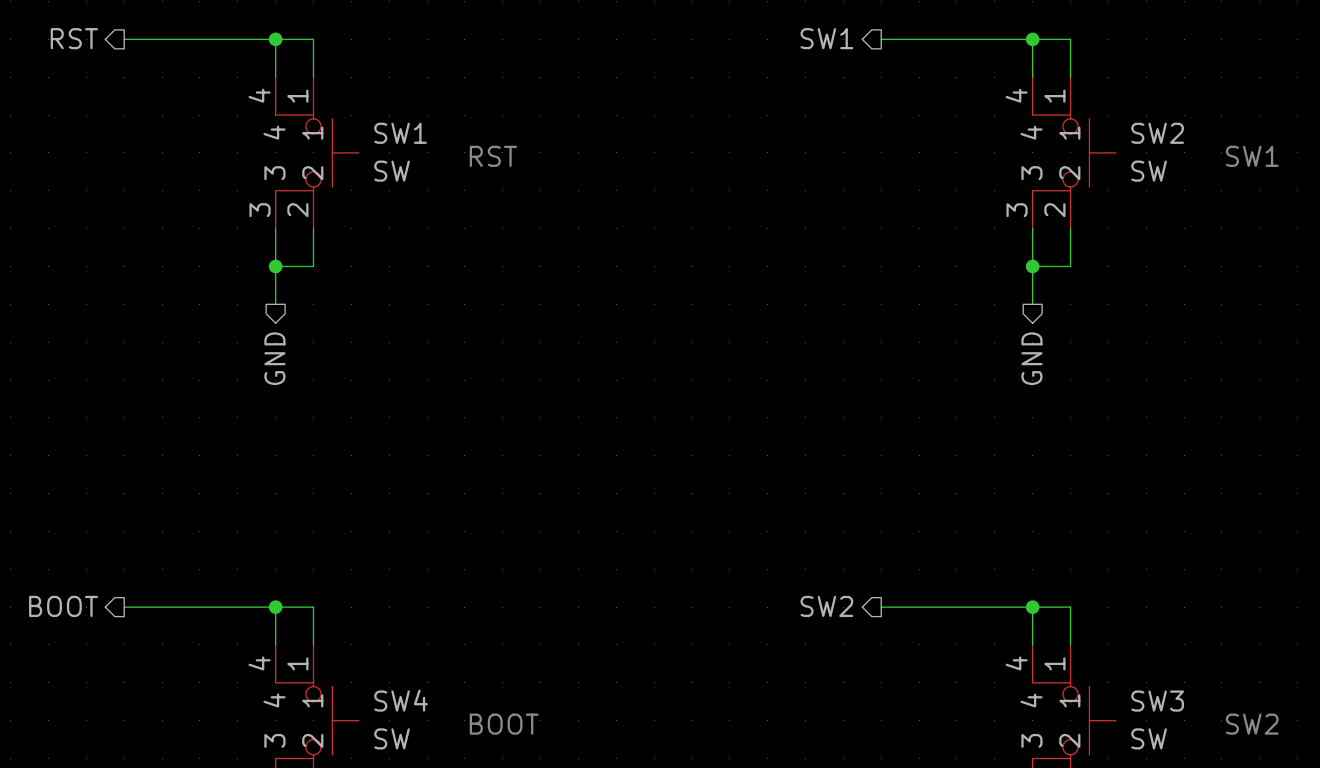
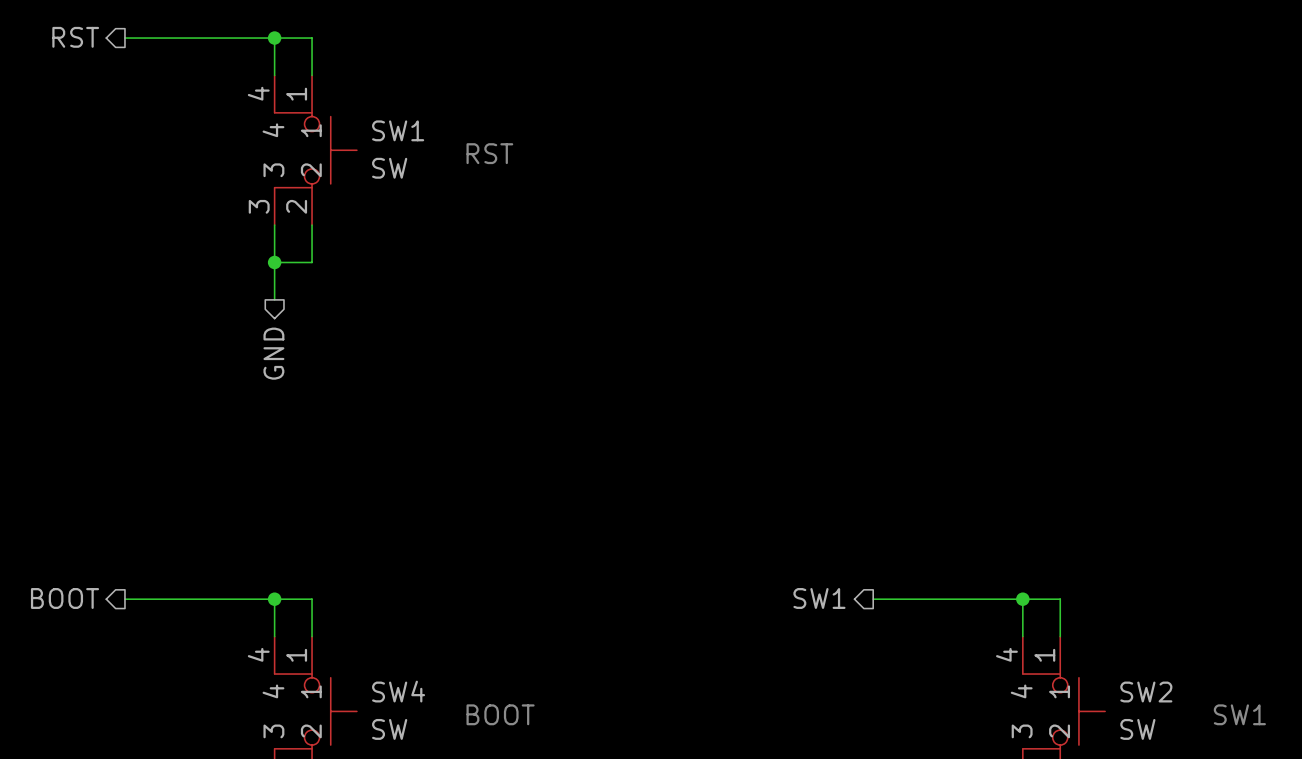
hierarchical label: SW1 (826, 38) -> none
wire: (881, 39) (1070, 39) (1070, 77) -> none
wire: (1032, 39) (1032, 77) -> none
junction: (1032, 39) -> none
SW2: SW (1074, 152) -> none
text: SW1 (1252, 156) -> none
wire: (1032, 228) (1032, 304) -> none
wire: (1070, 228) (1070, 266) (1032, 266) -> none
junction: (1032, 266) -> none
hierarchical label: GND (1031, 358) -> none
hierarchical label: SW2 (826, 606) -> SW1 (819, 598)
SW3 name: SW3 (1157, 701) -> SW2 (1146, 692)
text: SW2 (1252, 724) -> SW1 (1239, 714)

